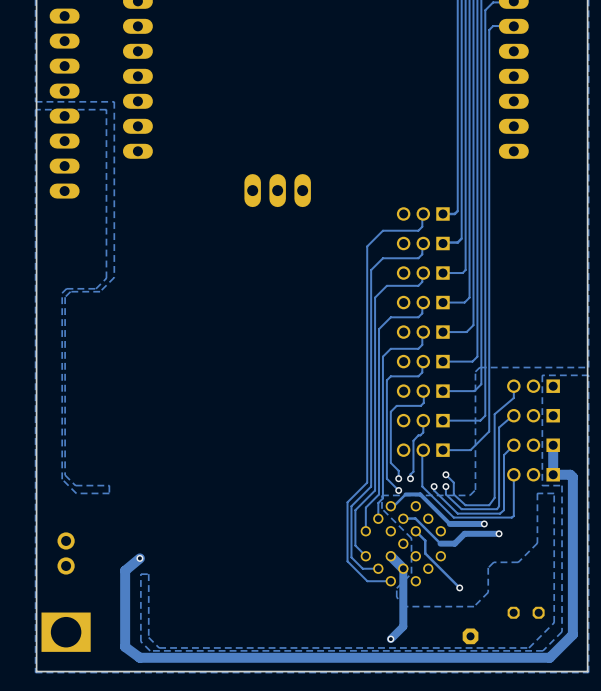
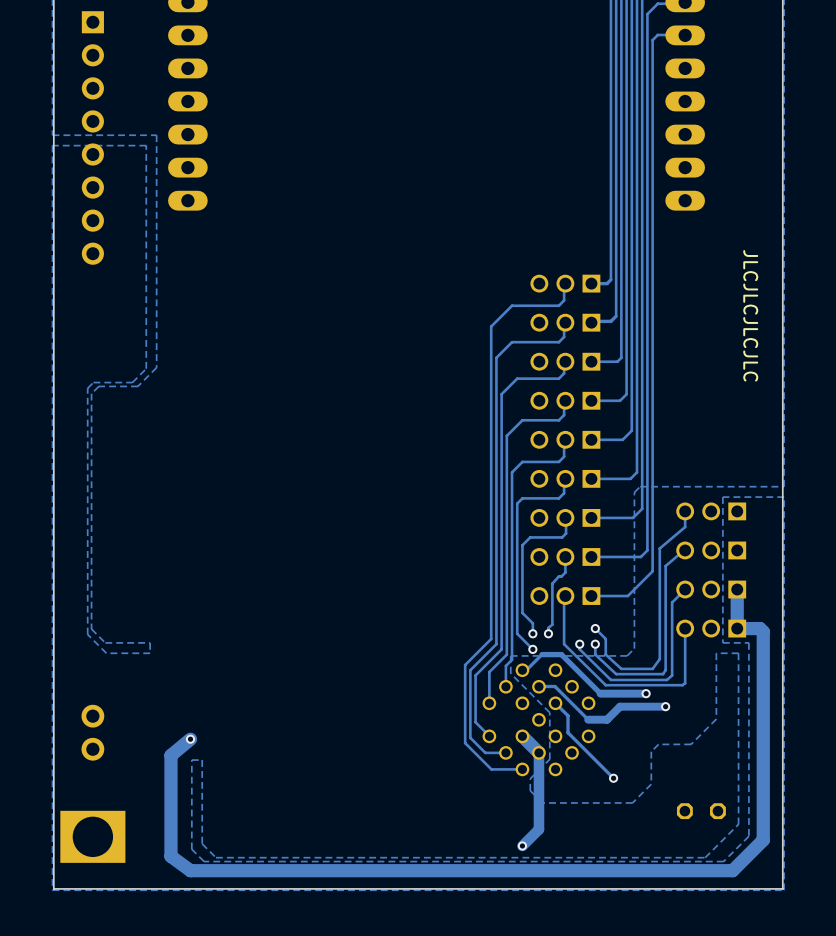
part footprint: [49, 8, 80, 199] -> [81, 11, 104, 265]
part: (277, 190) -> none
text: none -> JLCJLCJLCJLC (750, 315)
part: (470, 636) -> none

